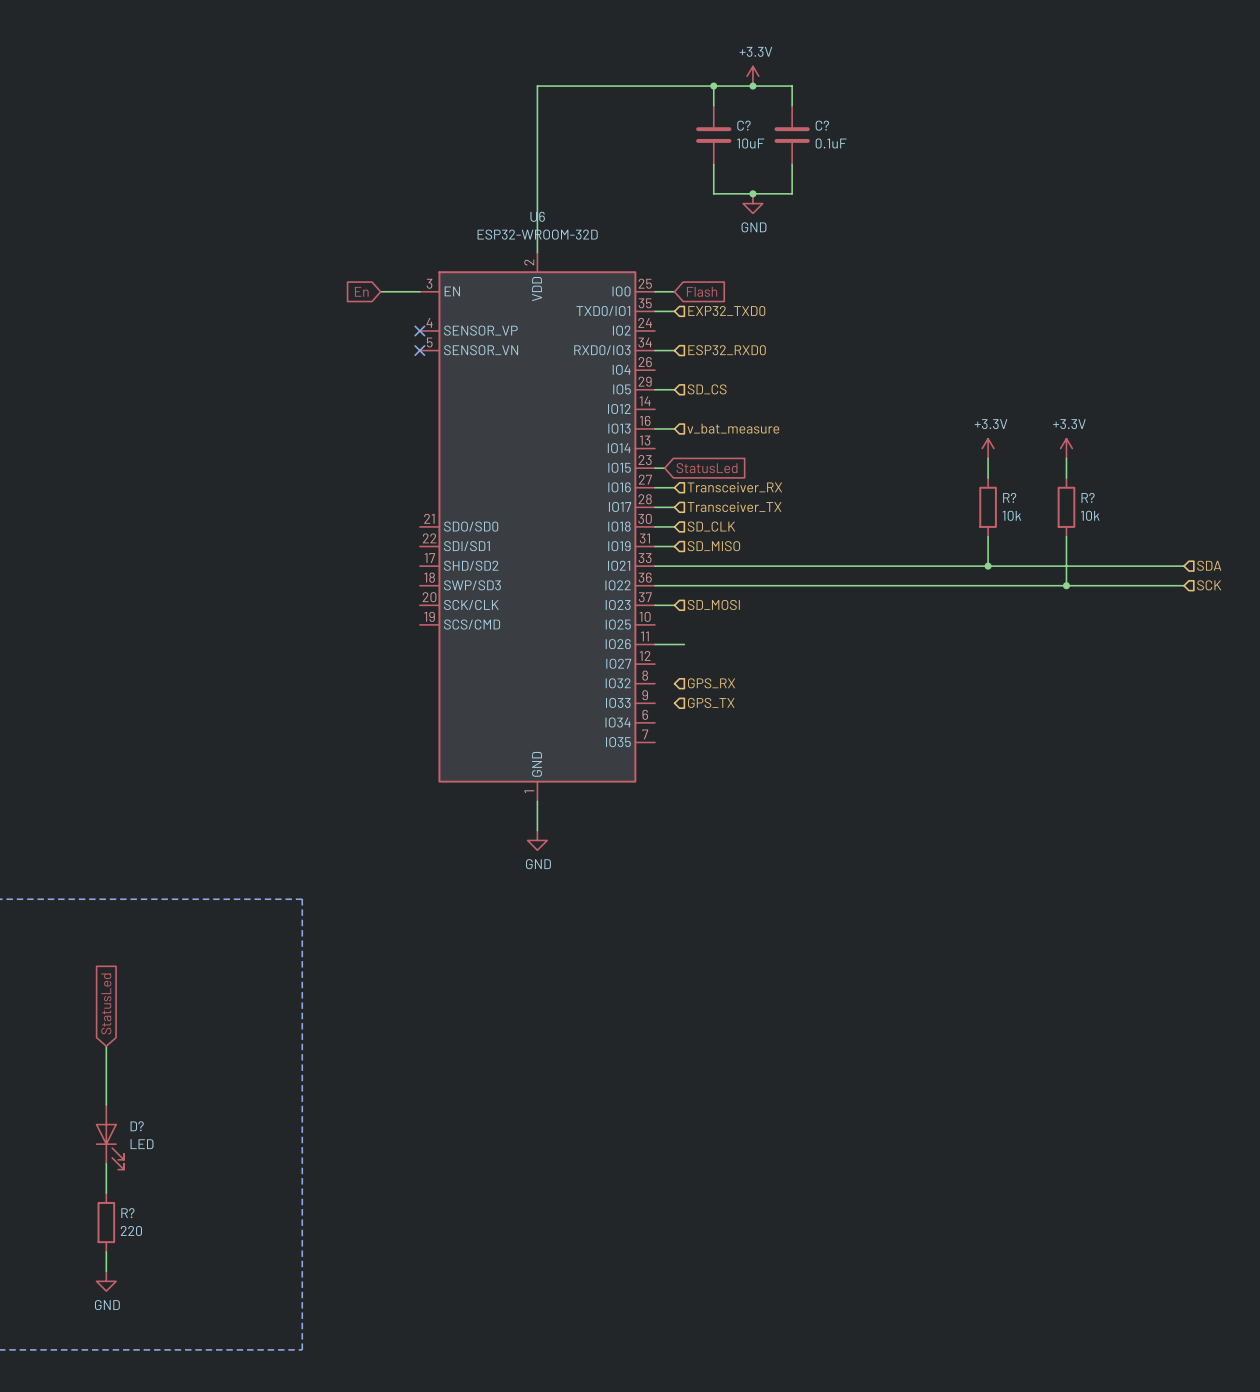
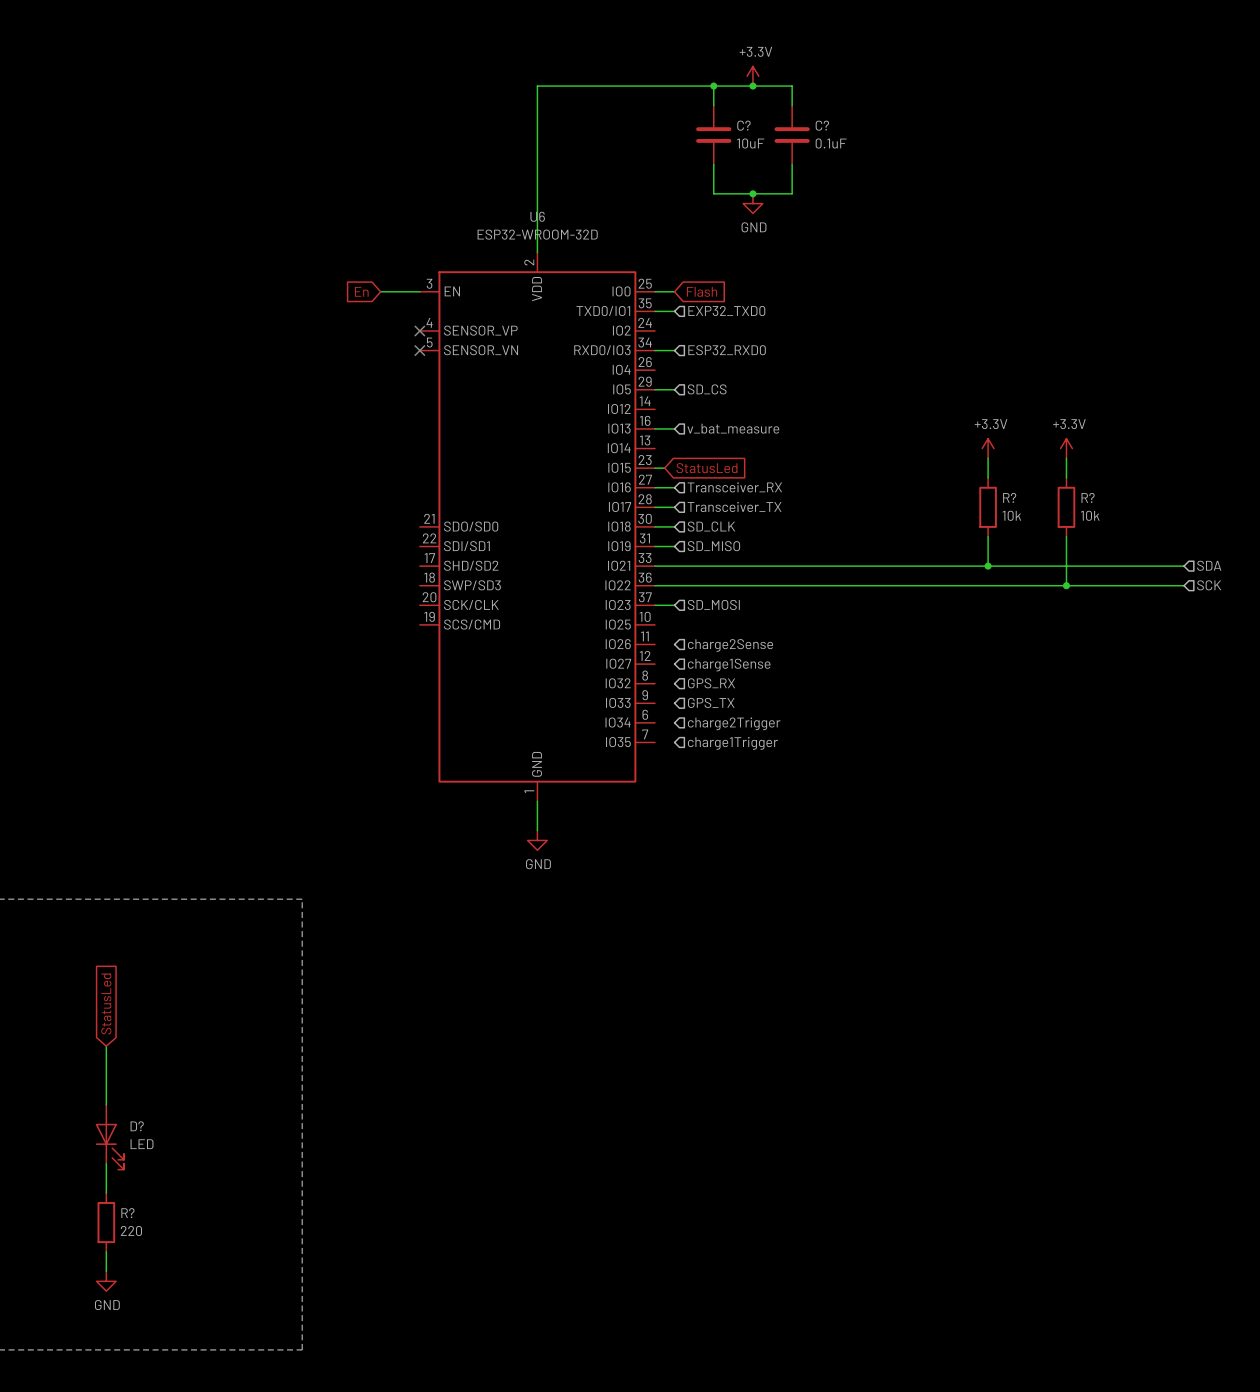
wire: (654, 644) (684, 644) -> none
hierarchical label: none -> charge2Sense (730, 645)
hierarchical label: none -> charge1Sense (729, 665)
hierarchical label: none -> charge2Trigger (734, 723)
hierarchical label: none -> charge1Trigger (732, 743)

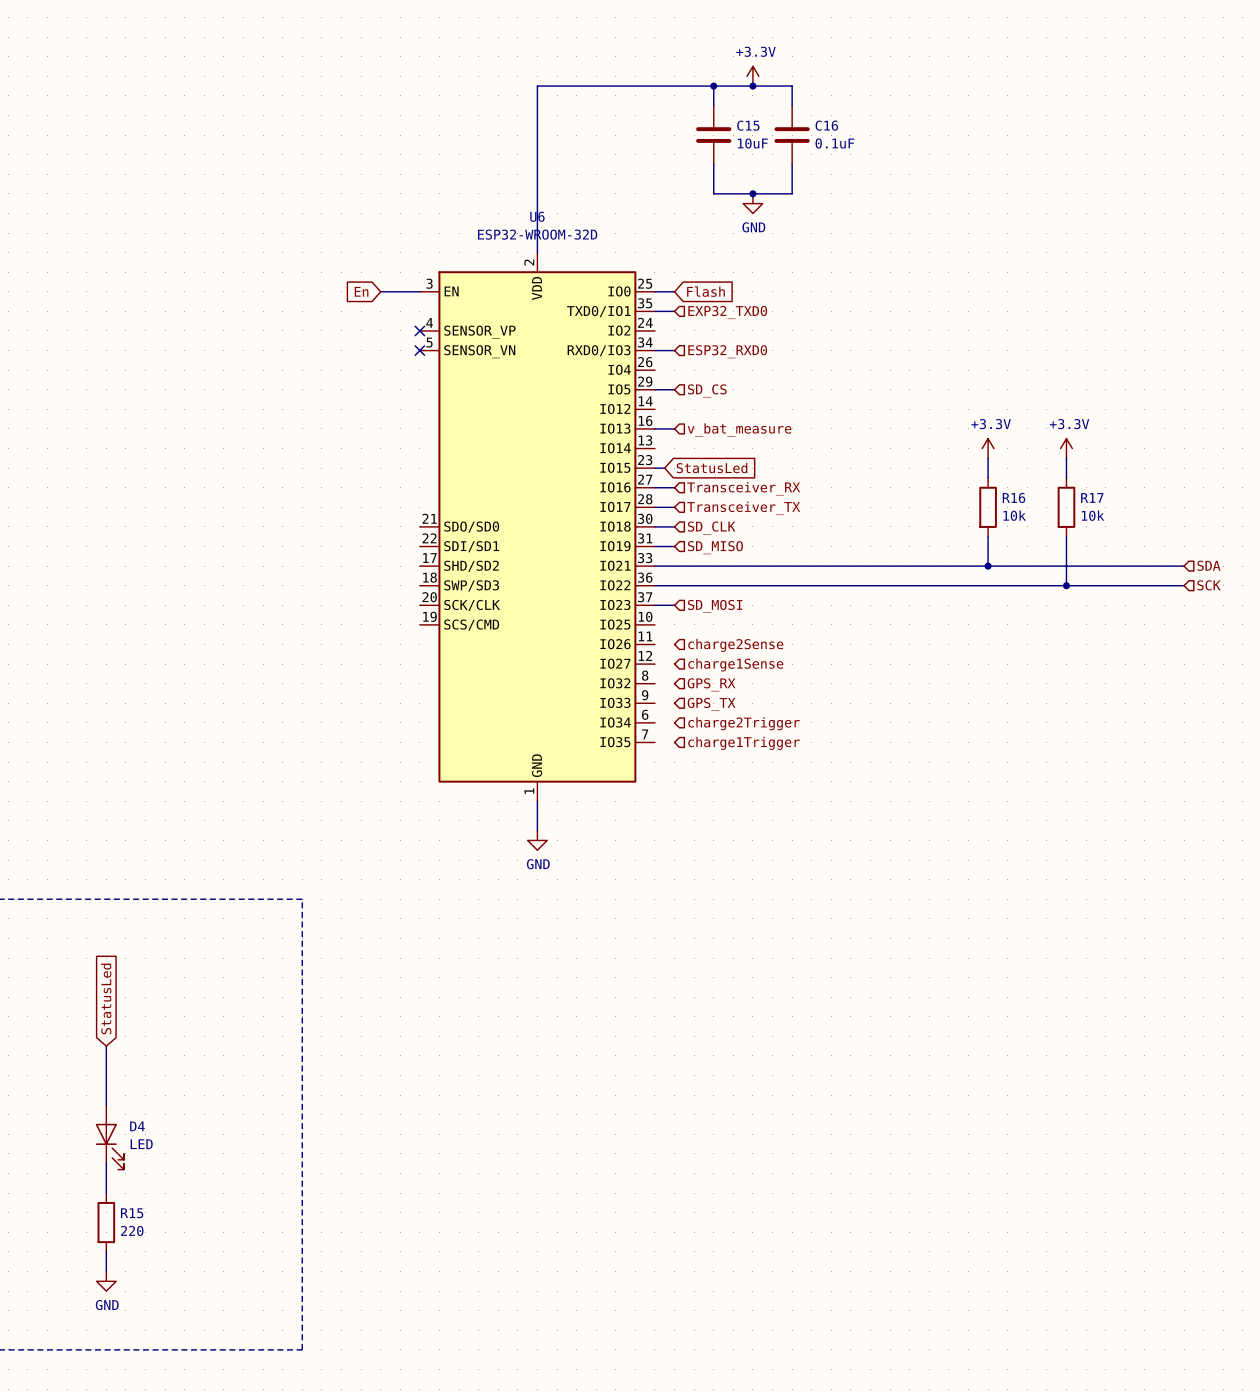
C? name: C? (743, 125) -> C15 (748, 125)
C? name: C? (822, 125) -> C16 (826, 125)
R? name: R? (1009, 497) -> R16 (1013, 497)
R? name: R? (1088, 497) -> R17 (1092, 497)
D? name: D? (137, 1126) -> D4 (137, 1126)
R? name: R? (127, 1213) -> R15 (132, 1213)

